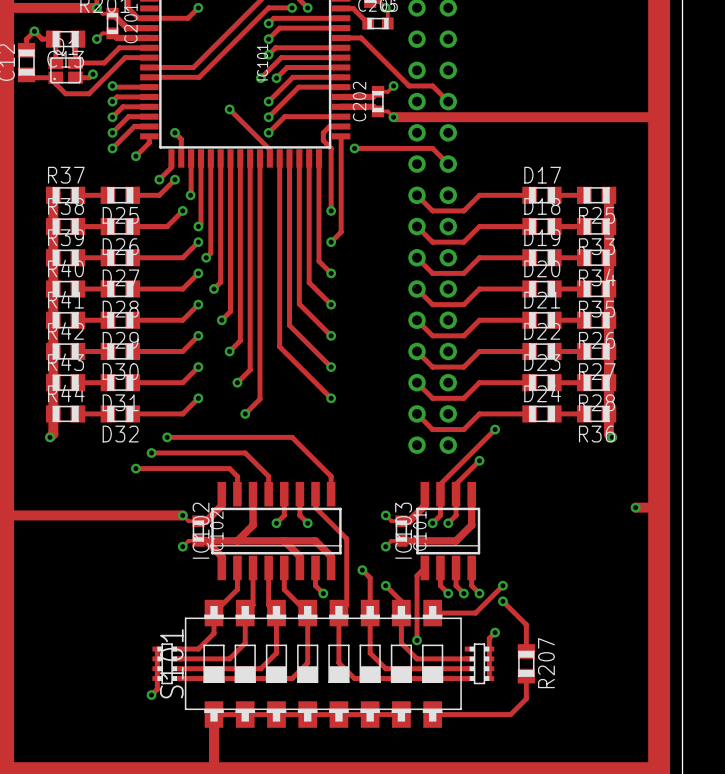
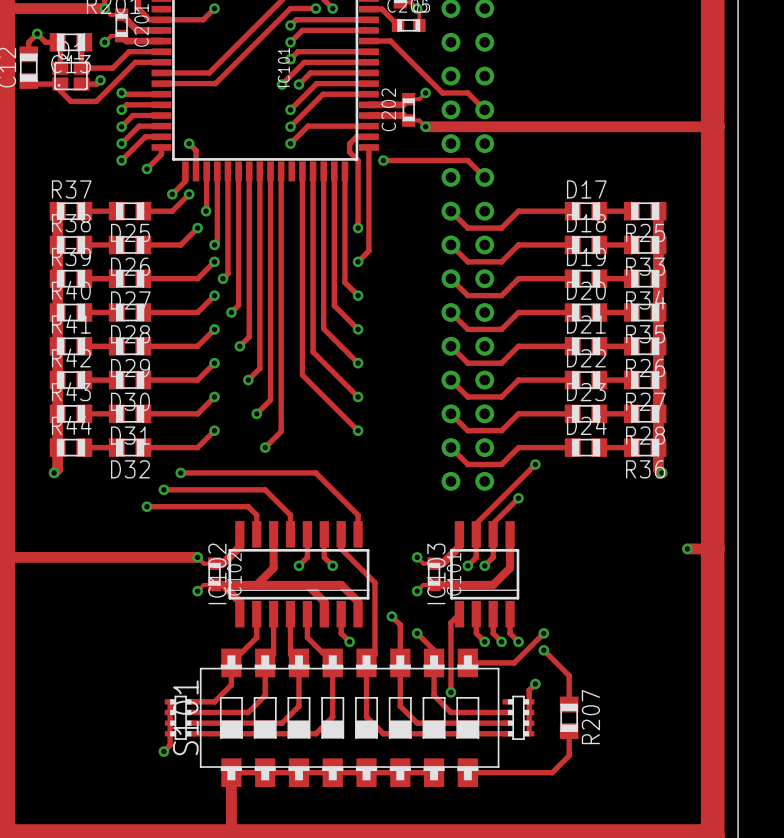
track: (229, 109) (269, 149) (269, 158) -> none
via: (229, 109) -> none

